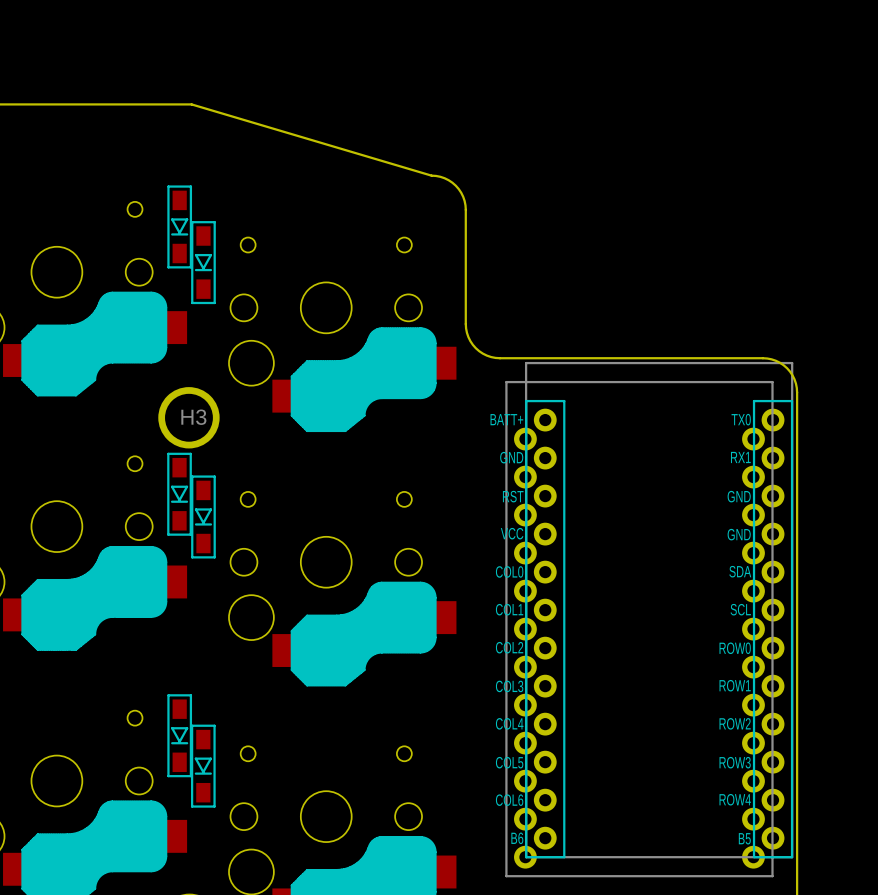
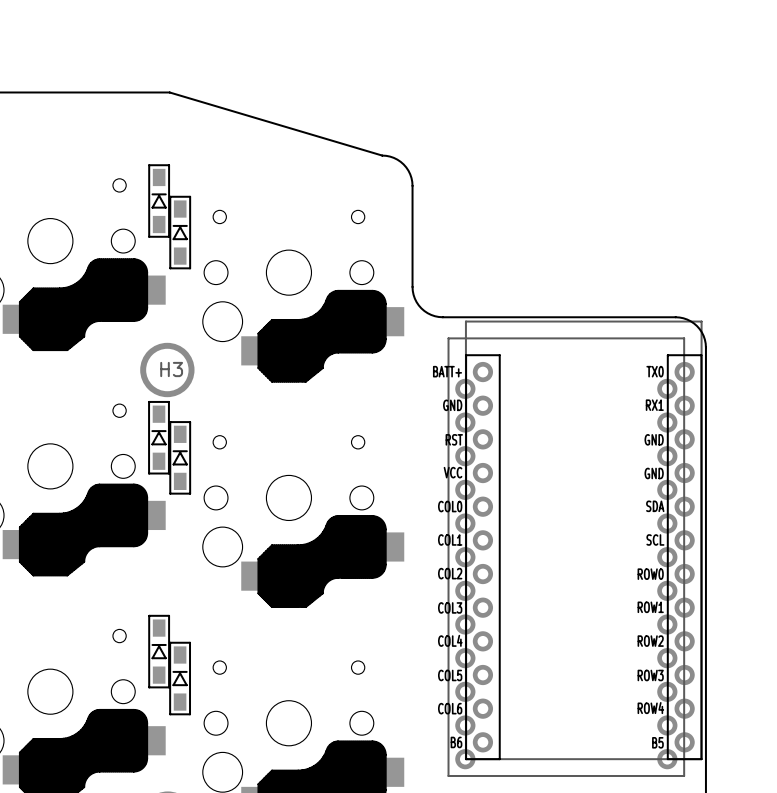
part rotation: 0° (179, 226) -> 180° (159, 201)
part rotation: 0° (203, 262) -> 180° (180, 232)
part rotation: 0° (179, 494) -> 180° (159, 437)
part rotation: 0° (203, 516) -> 180° (180, 457)
part rotation: 0° (179, 735) -> 180° (159, 651)
part rotation: 0° (203, 766) -> 180° (180, 678)

